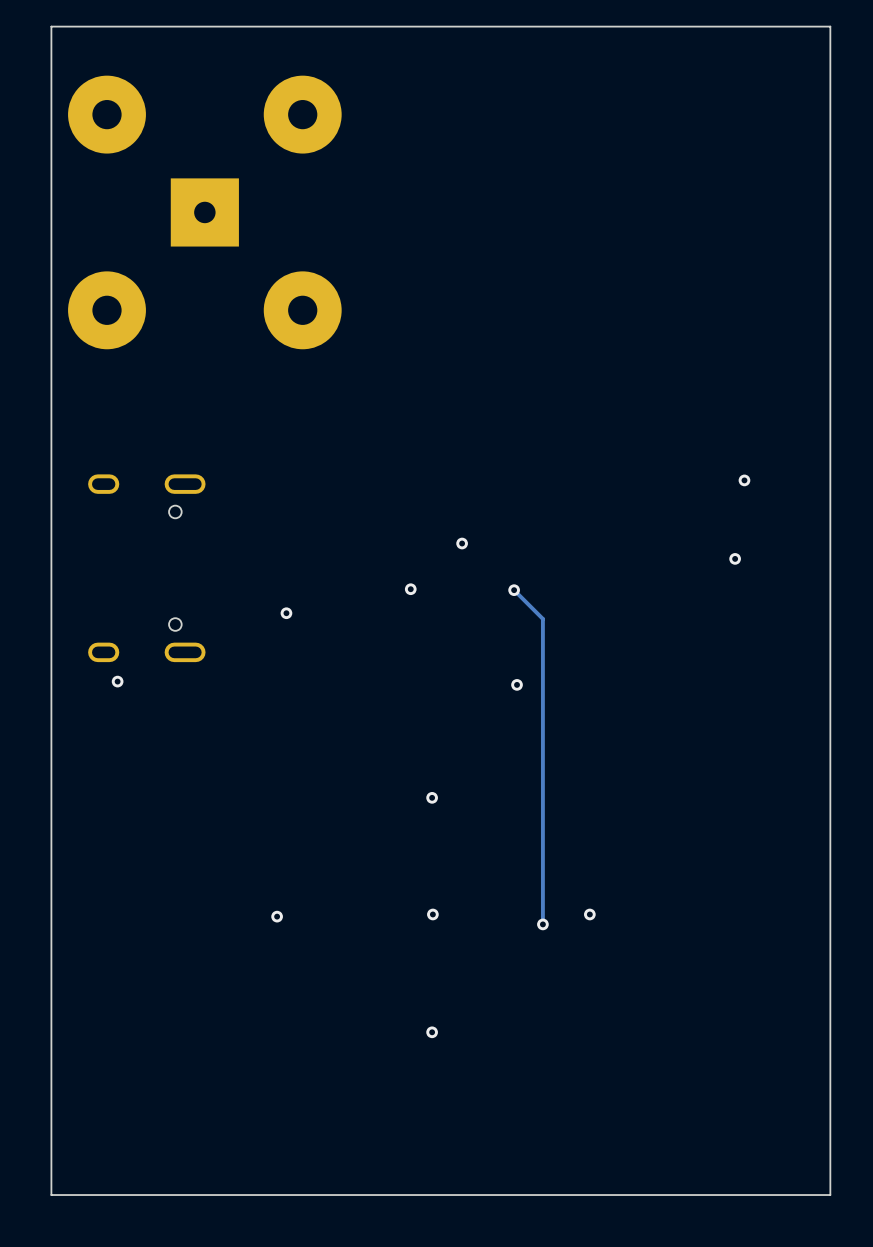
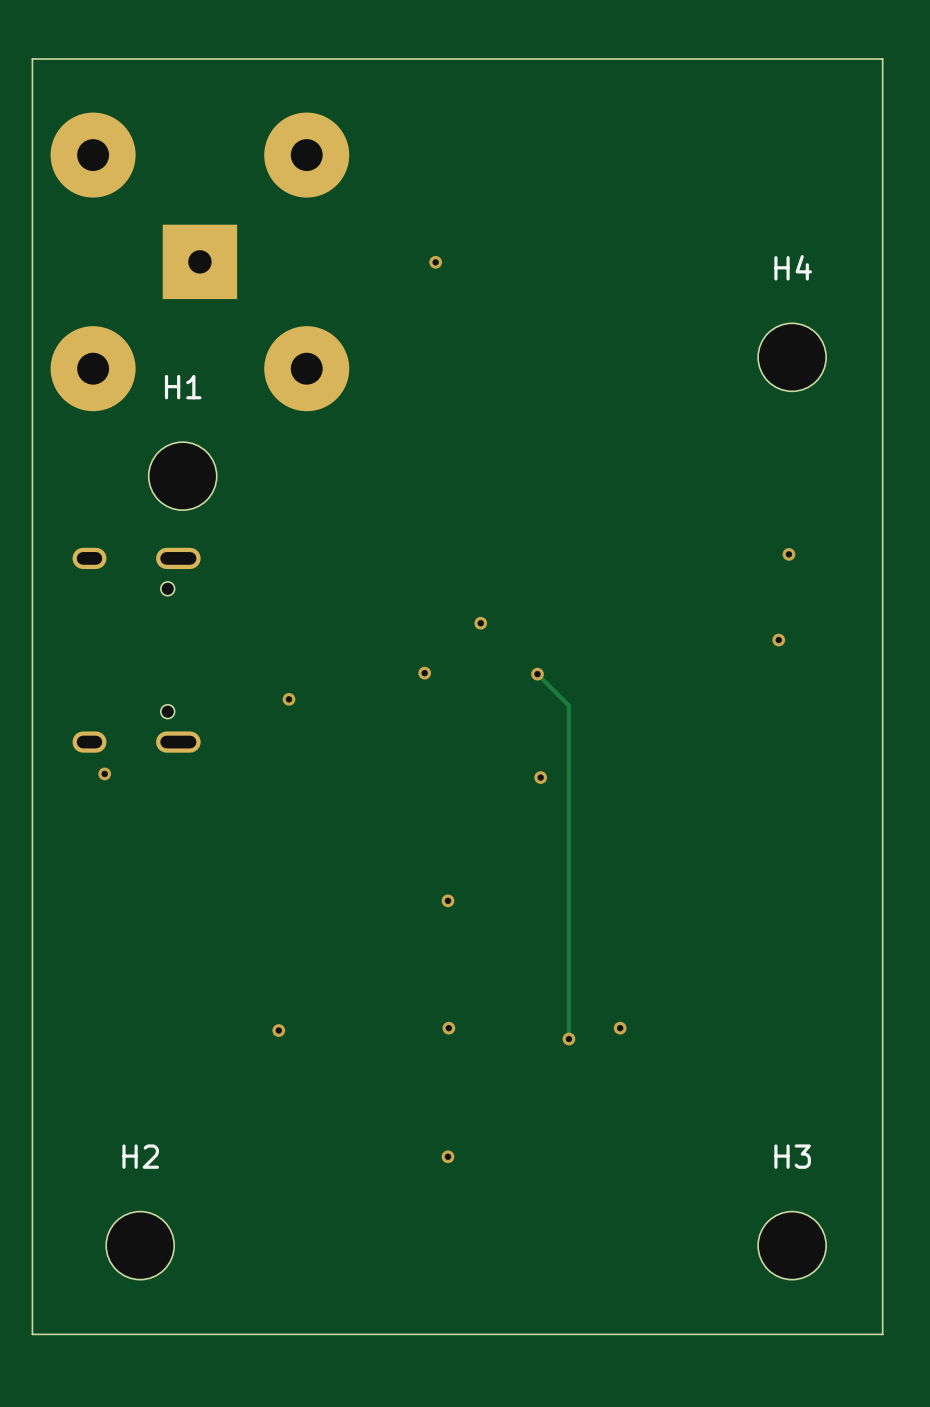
via: none -> (435, 262)
H4: none -> (792, 357)
H1: none -> (182, 476)
H2: none -> (140, 1245)
H3: none -> (792, 1245)

